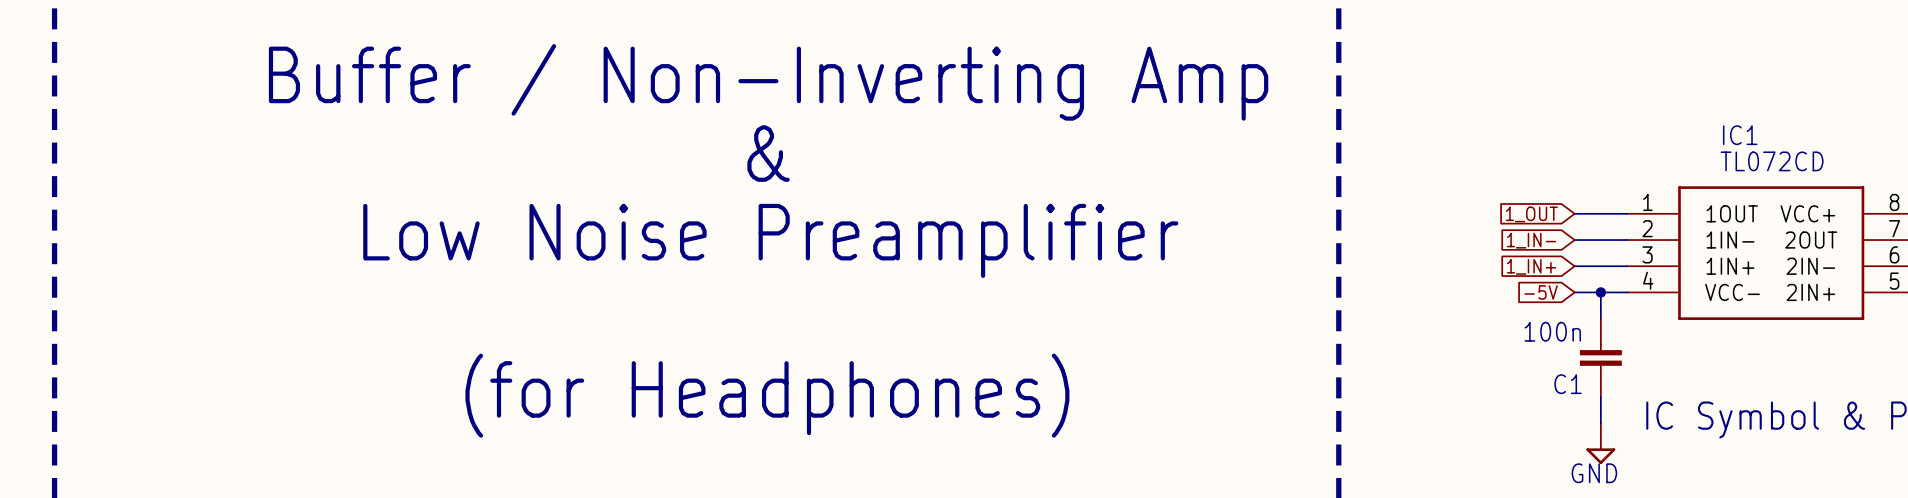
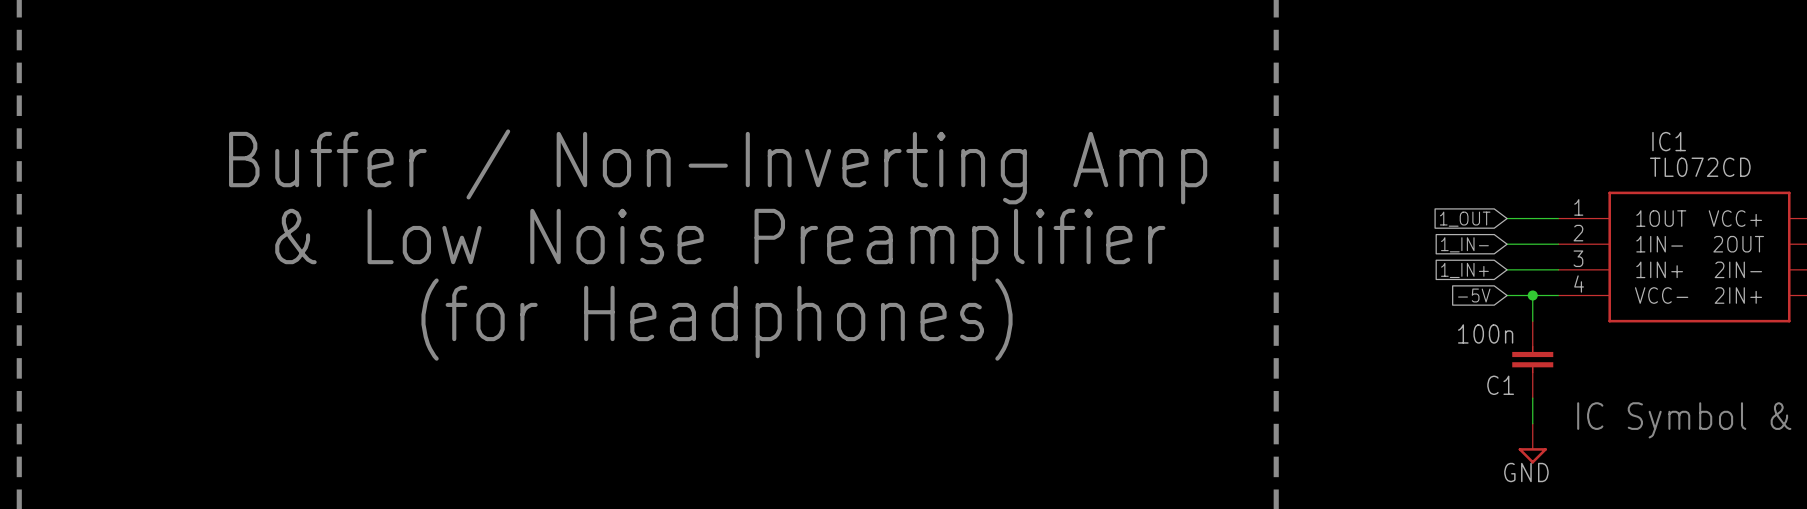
text: Buffer / Non-Inverting Amp (768, 82) -> none
text: & (768, 153) -> Buffer / Non-Inverting Amp (718, 166)
text: Low Noise Preamplifier (770, 240) -> & Low Noise Preamplifier (720, 245)
text position: (for Headphones) (767, 395) -> (for Headphones) (717, 319)

